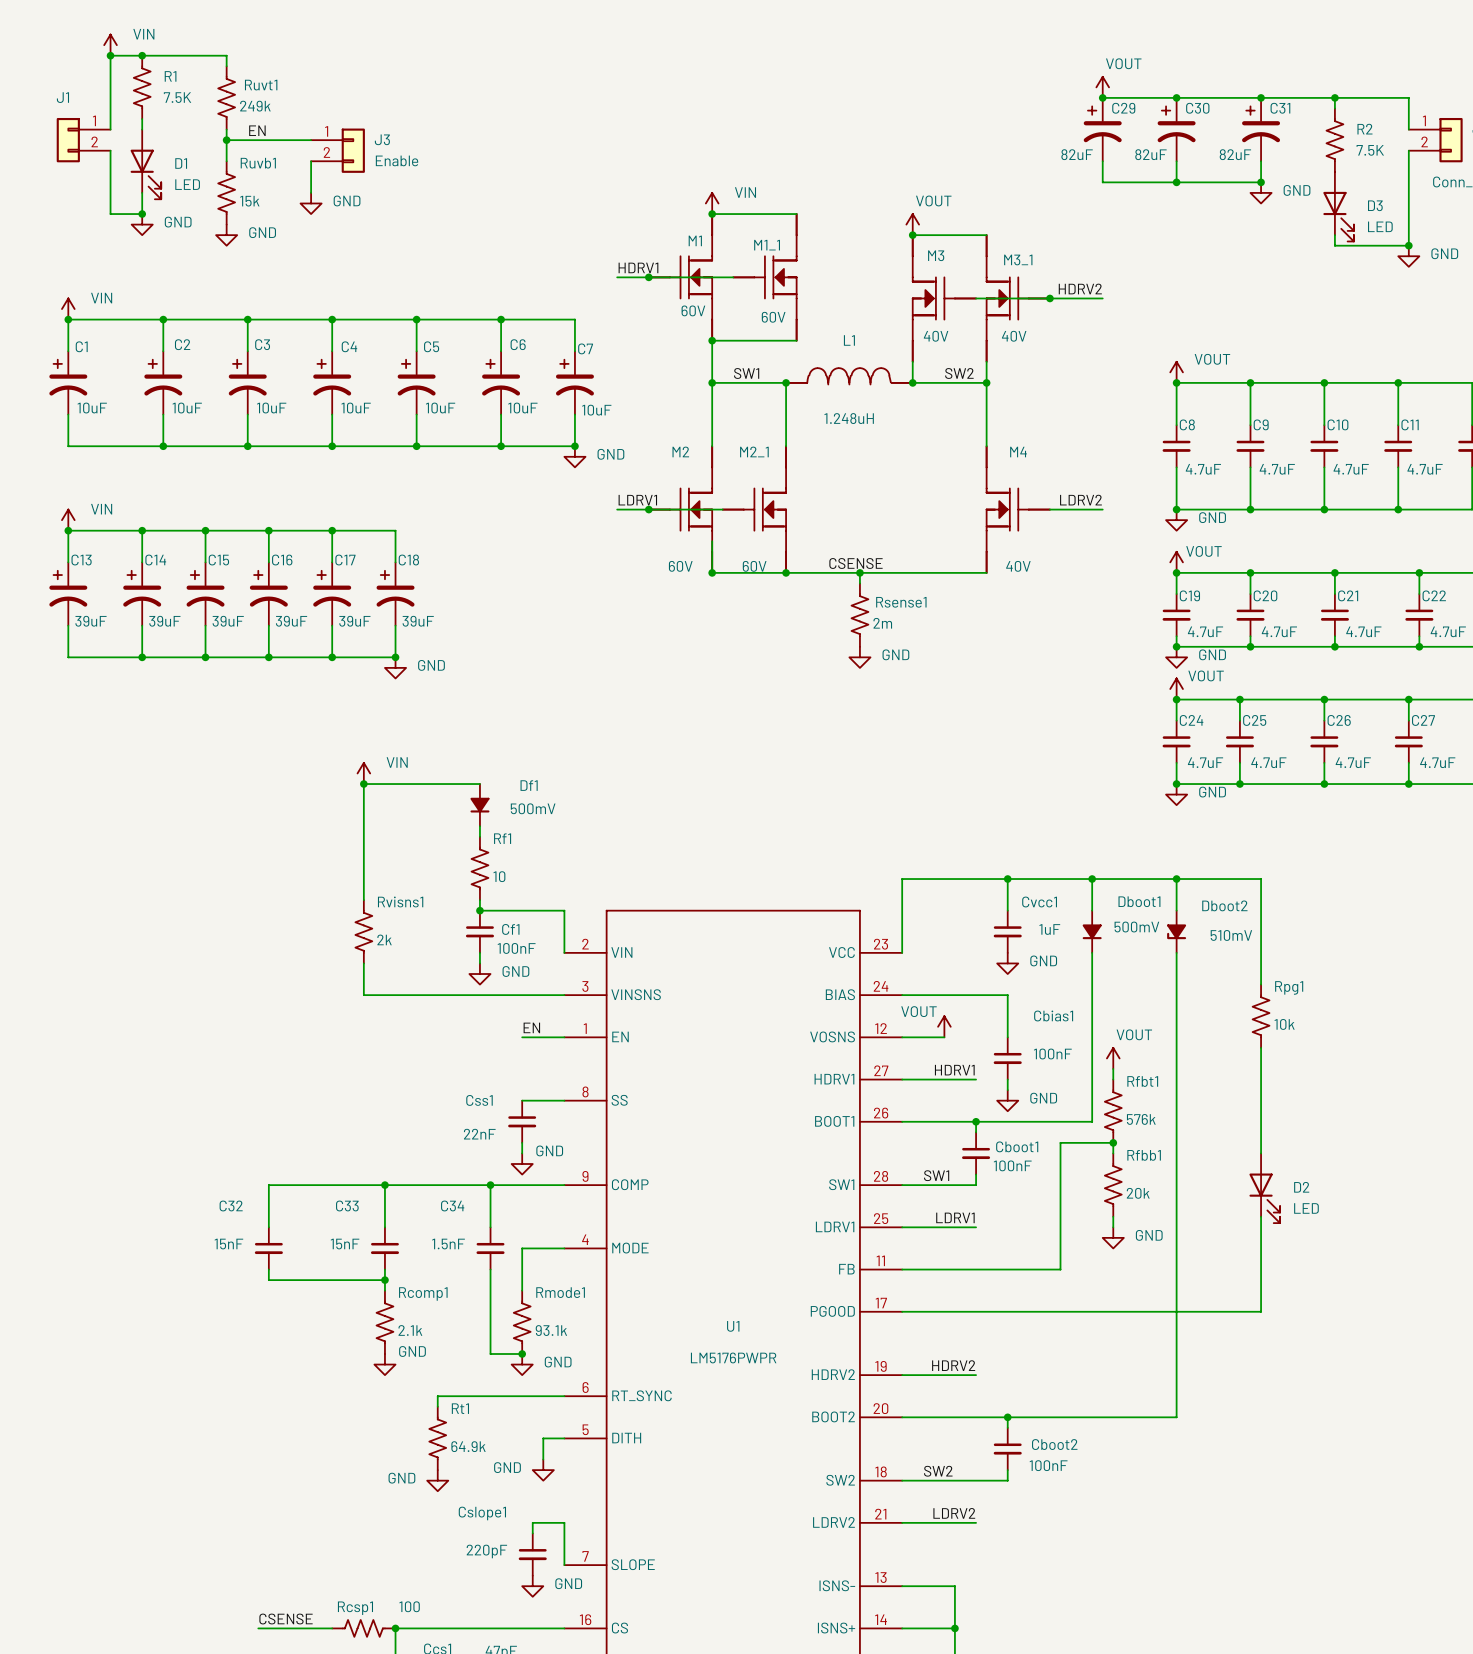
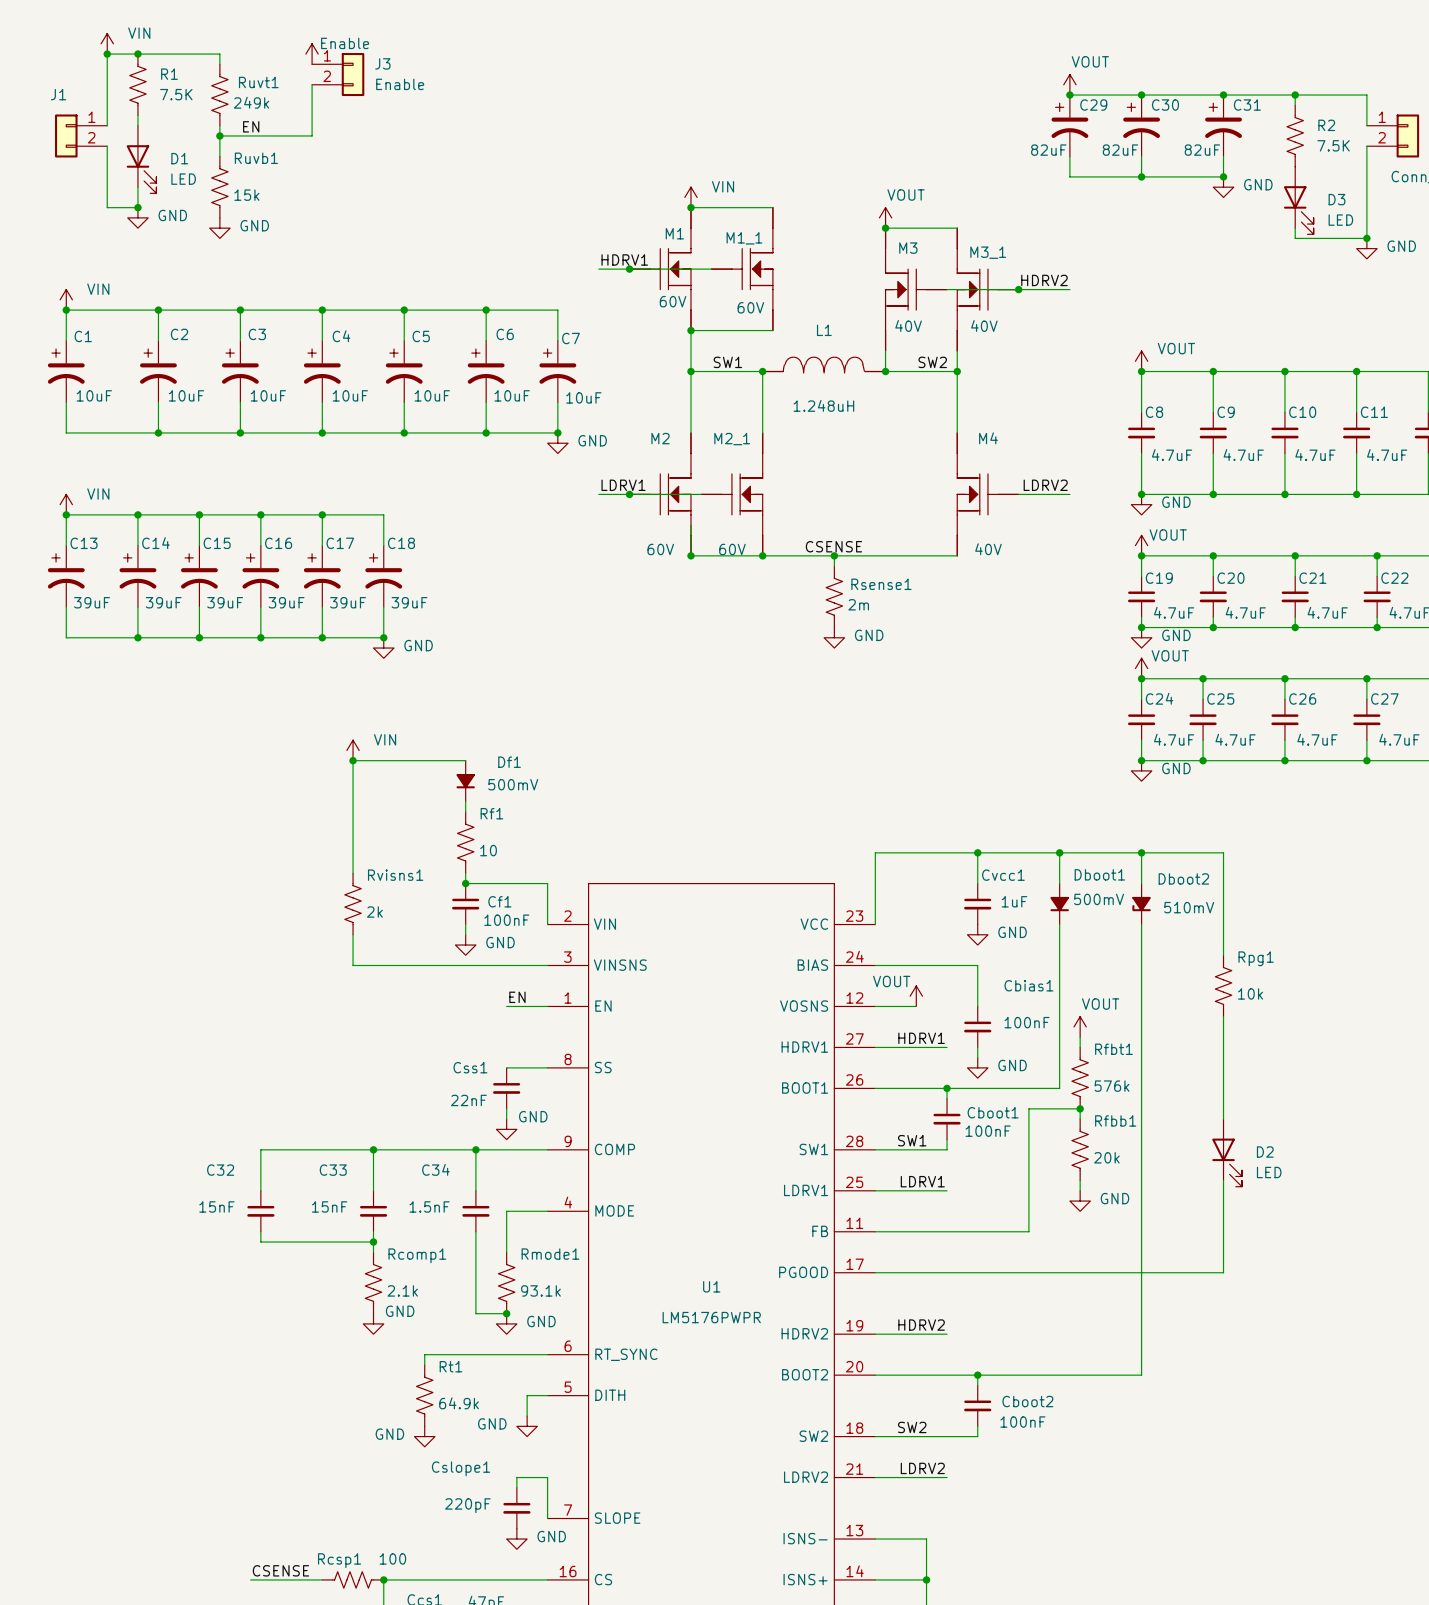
power symbol: none -> Enable (312, 54)
wire: none -> (312, 84) (312, 135) (301, 135)
J3 position: (338, 150) -> (338, 74)
wire: (311, 161) (311, 192) -> none
power symbol: GND (311, 203) -> none

